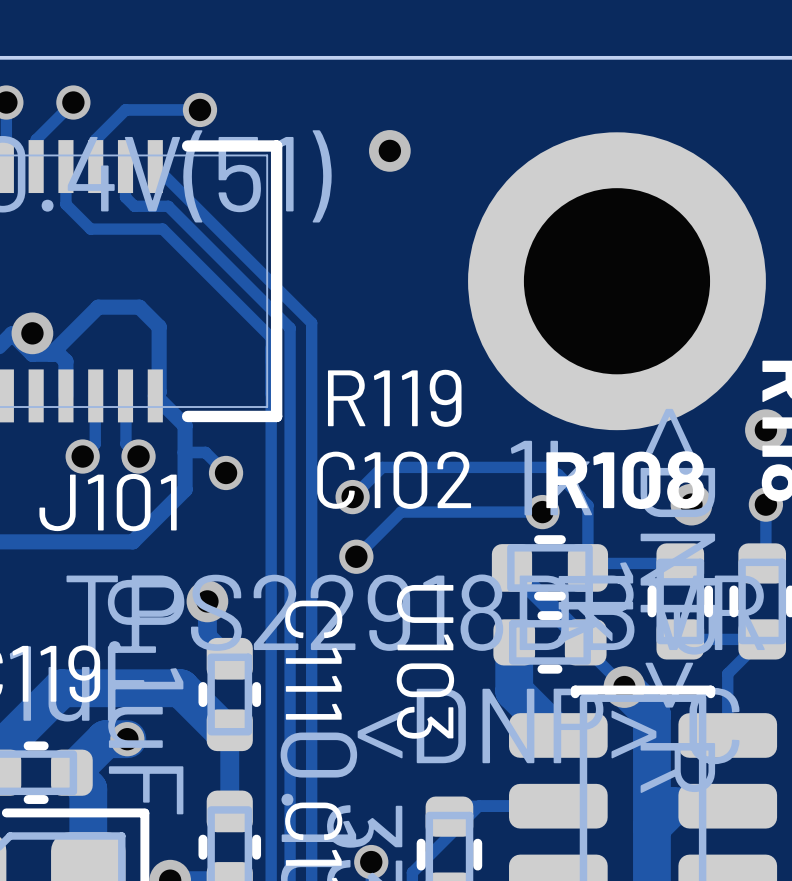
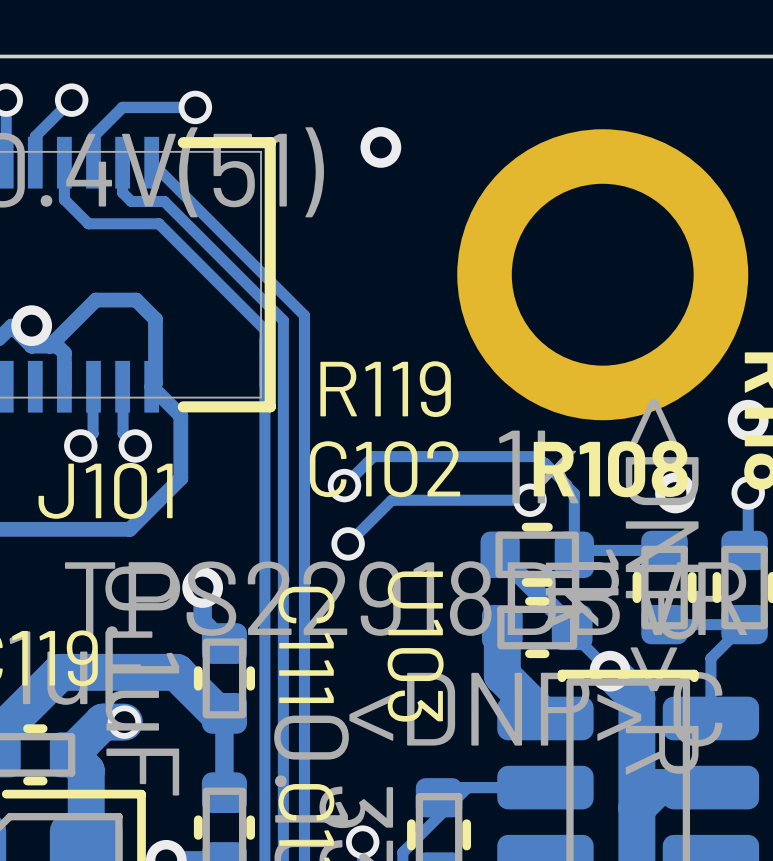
track: (185, 452) (205, 452) (226, 472) -> none
via: (226, 472) -> none

